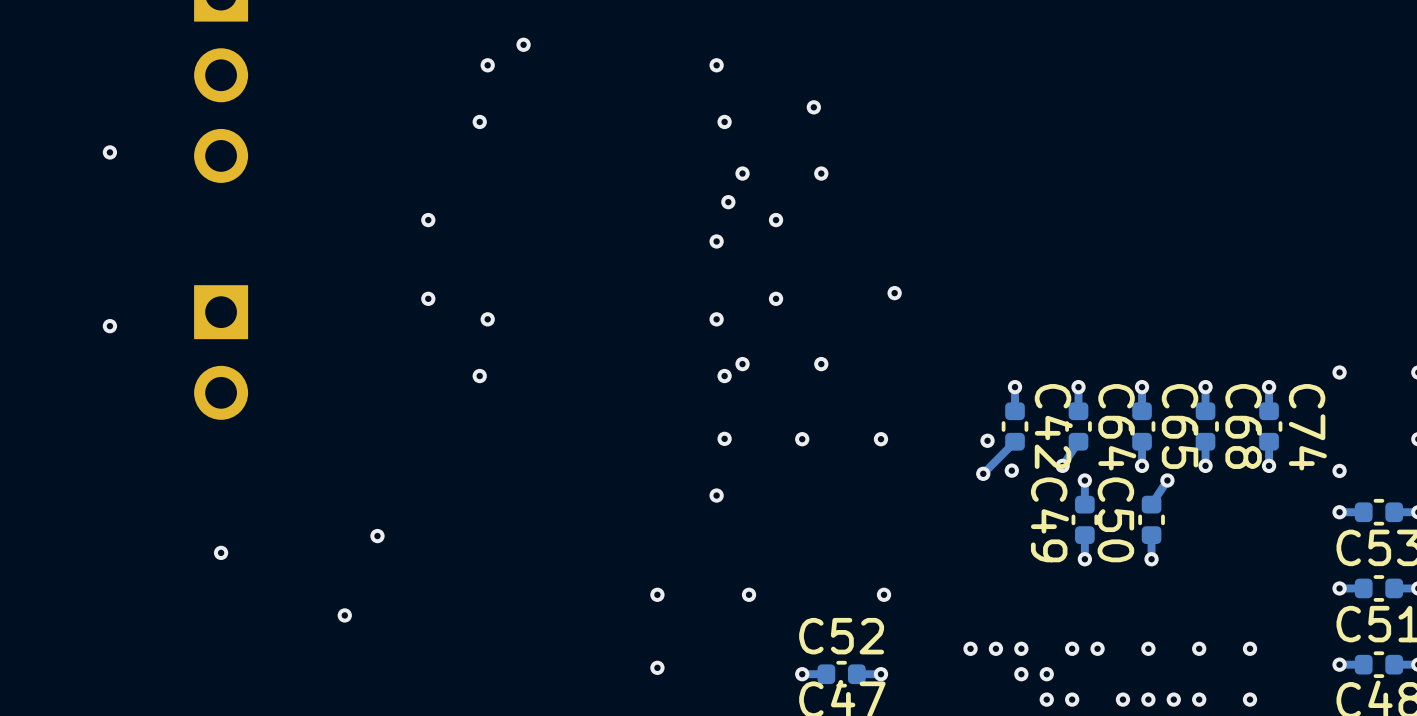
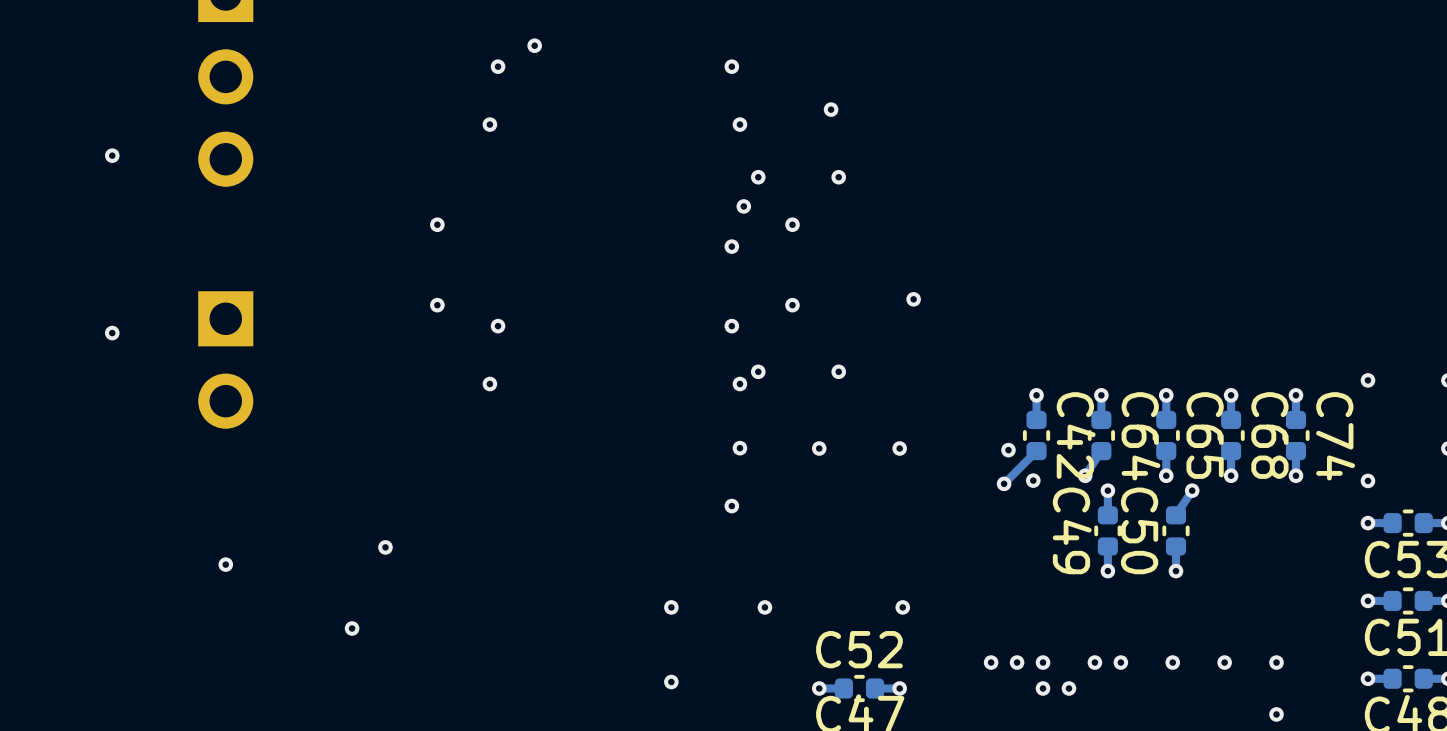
via: (1046, 699) -> none
via: (1072, 699) -> none
via: (1122, 699) -> none
via: (1148, 699) -> none
via: (1173, 699) -> none
via: (1199, 699) -> none

